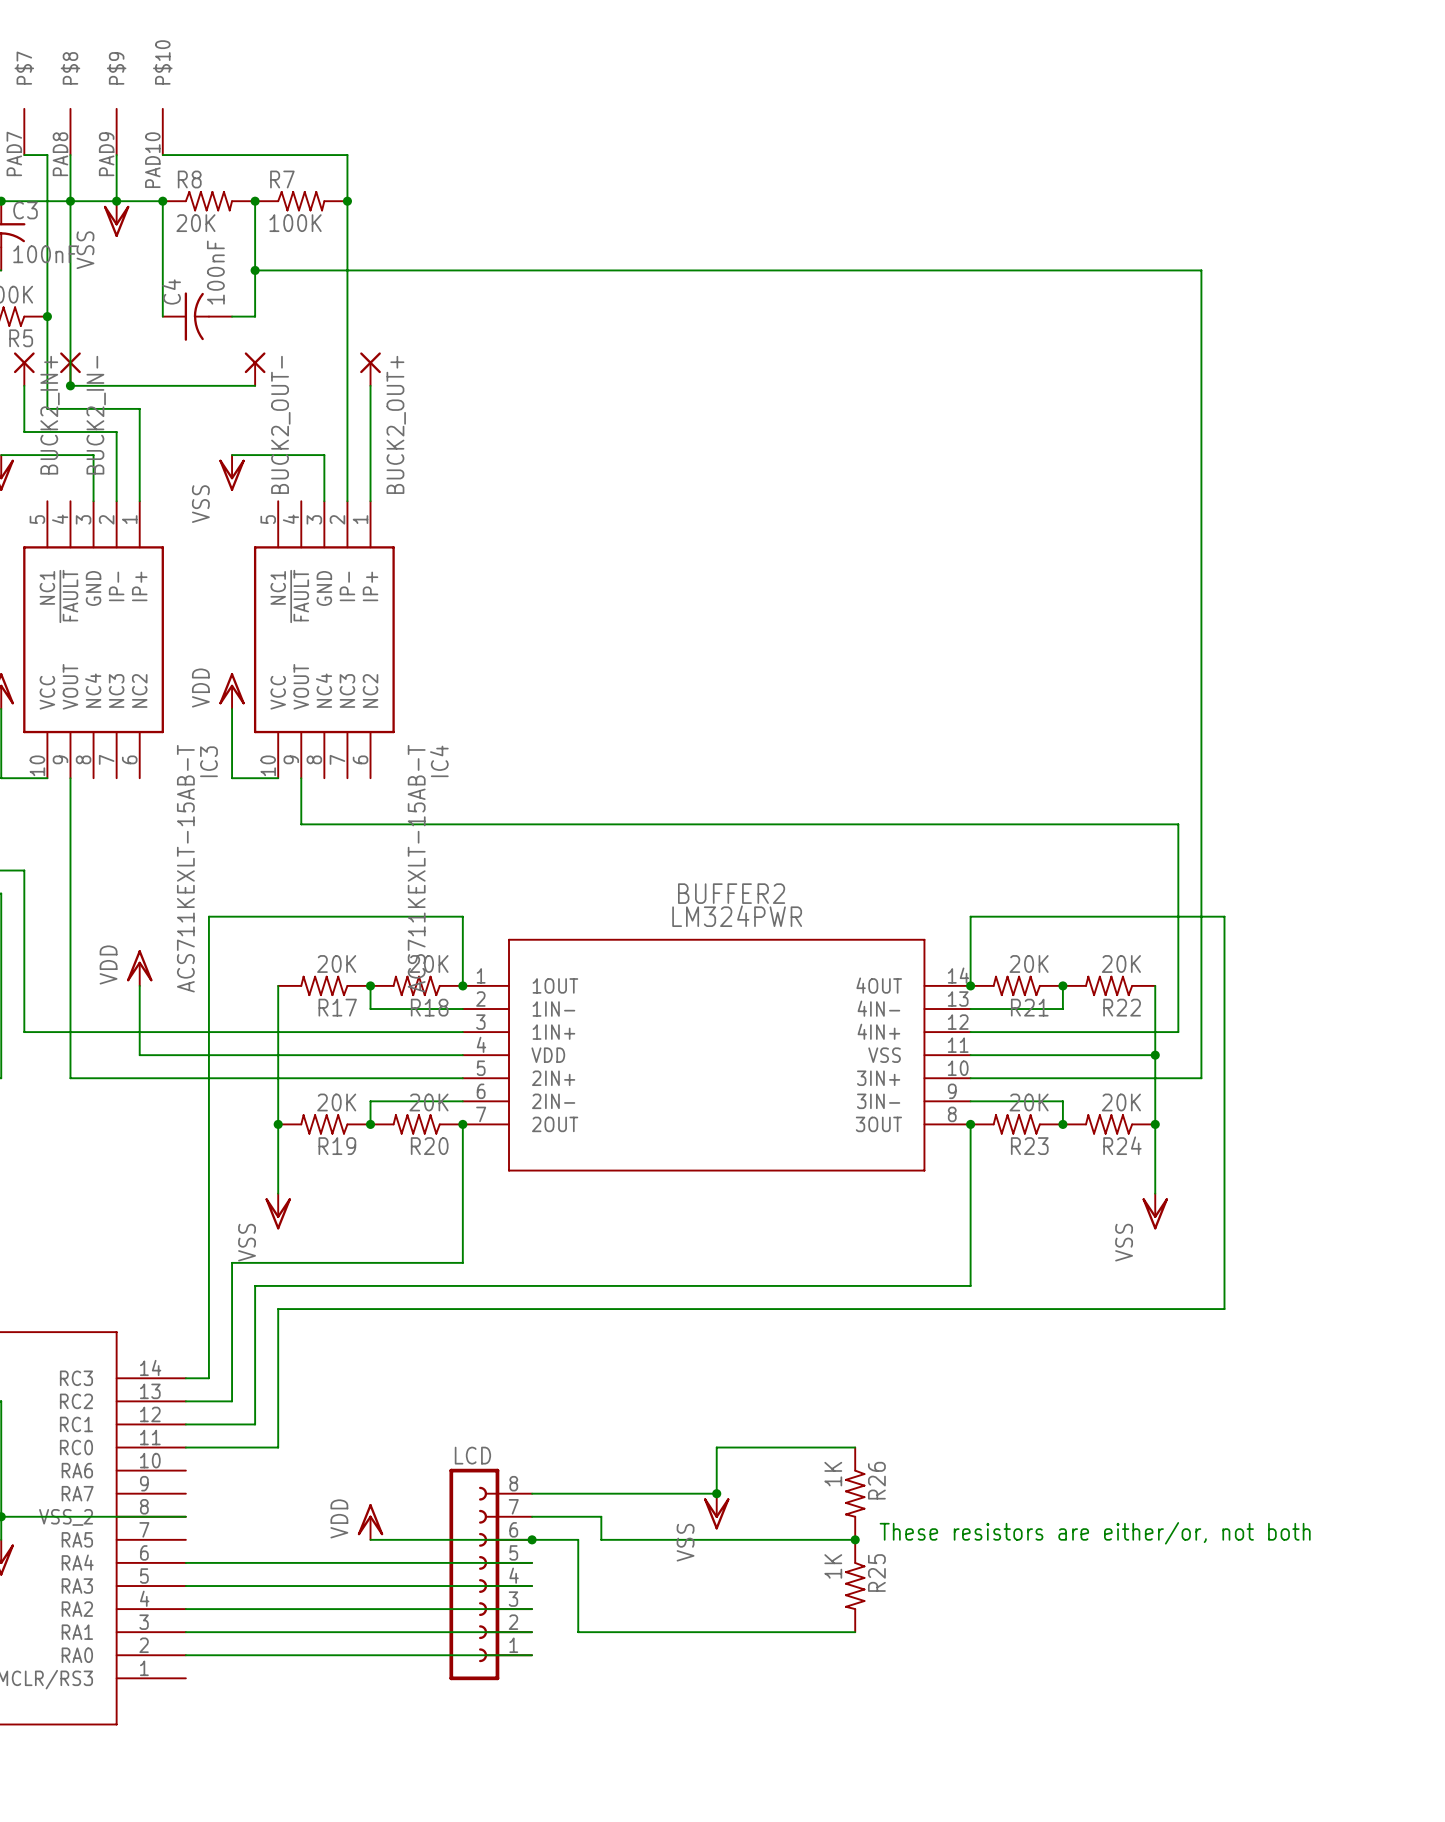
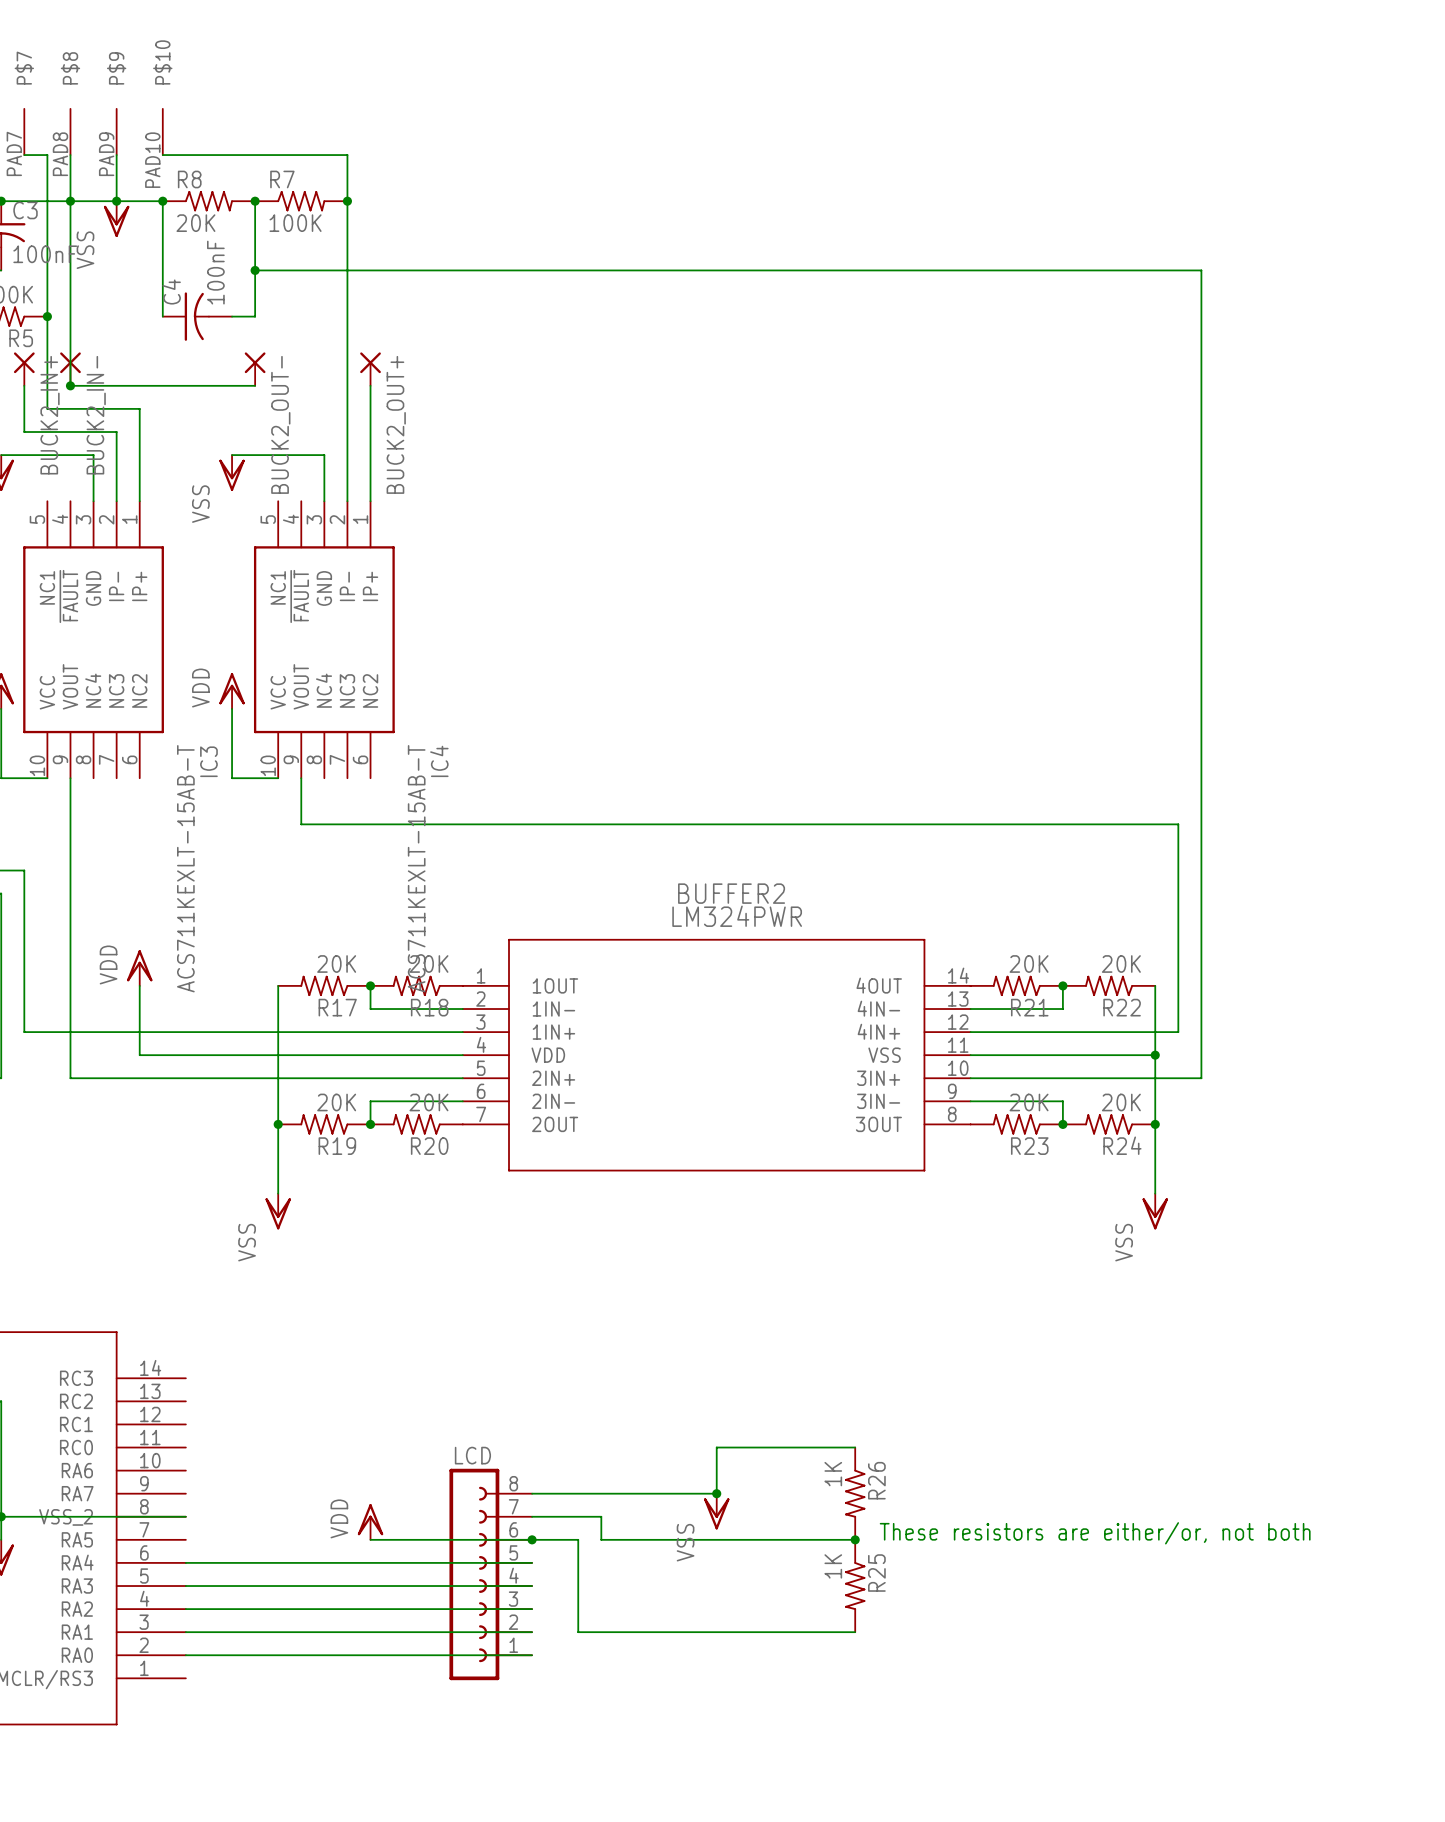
wire: (462, 985) (462, 916) (208, 916) (208, 1378) (185, 1378) -> none
junction: (462, 985) -> none
wire: (970, 985) (970, 916) (1224, 916) (1224, 1309) (278, 1309) (278, 1447) (185, 1447) -> none
junction: (970, 985) -> none
wire: (462, 1124) (462, 1262) (232, 1262) (232, 1401) (185, 1401) -> none
junction: (462, 1124) -> none
wire: (970, 1124) (970, 1285) (255, 1285) (255, 1424) (185, 1424) -> none
junction: (970, 1124) -> none

